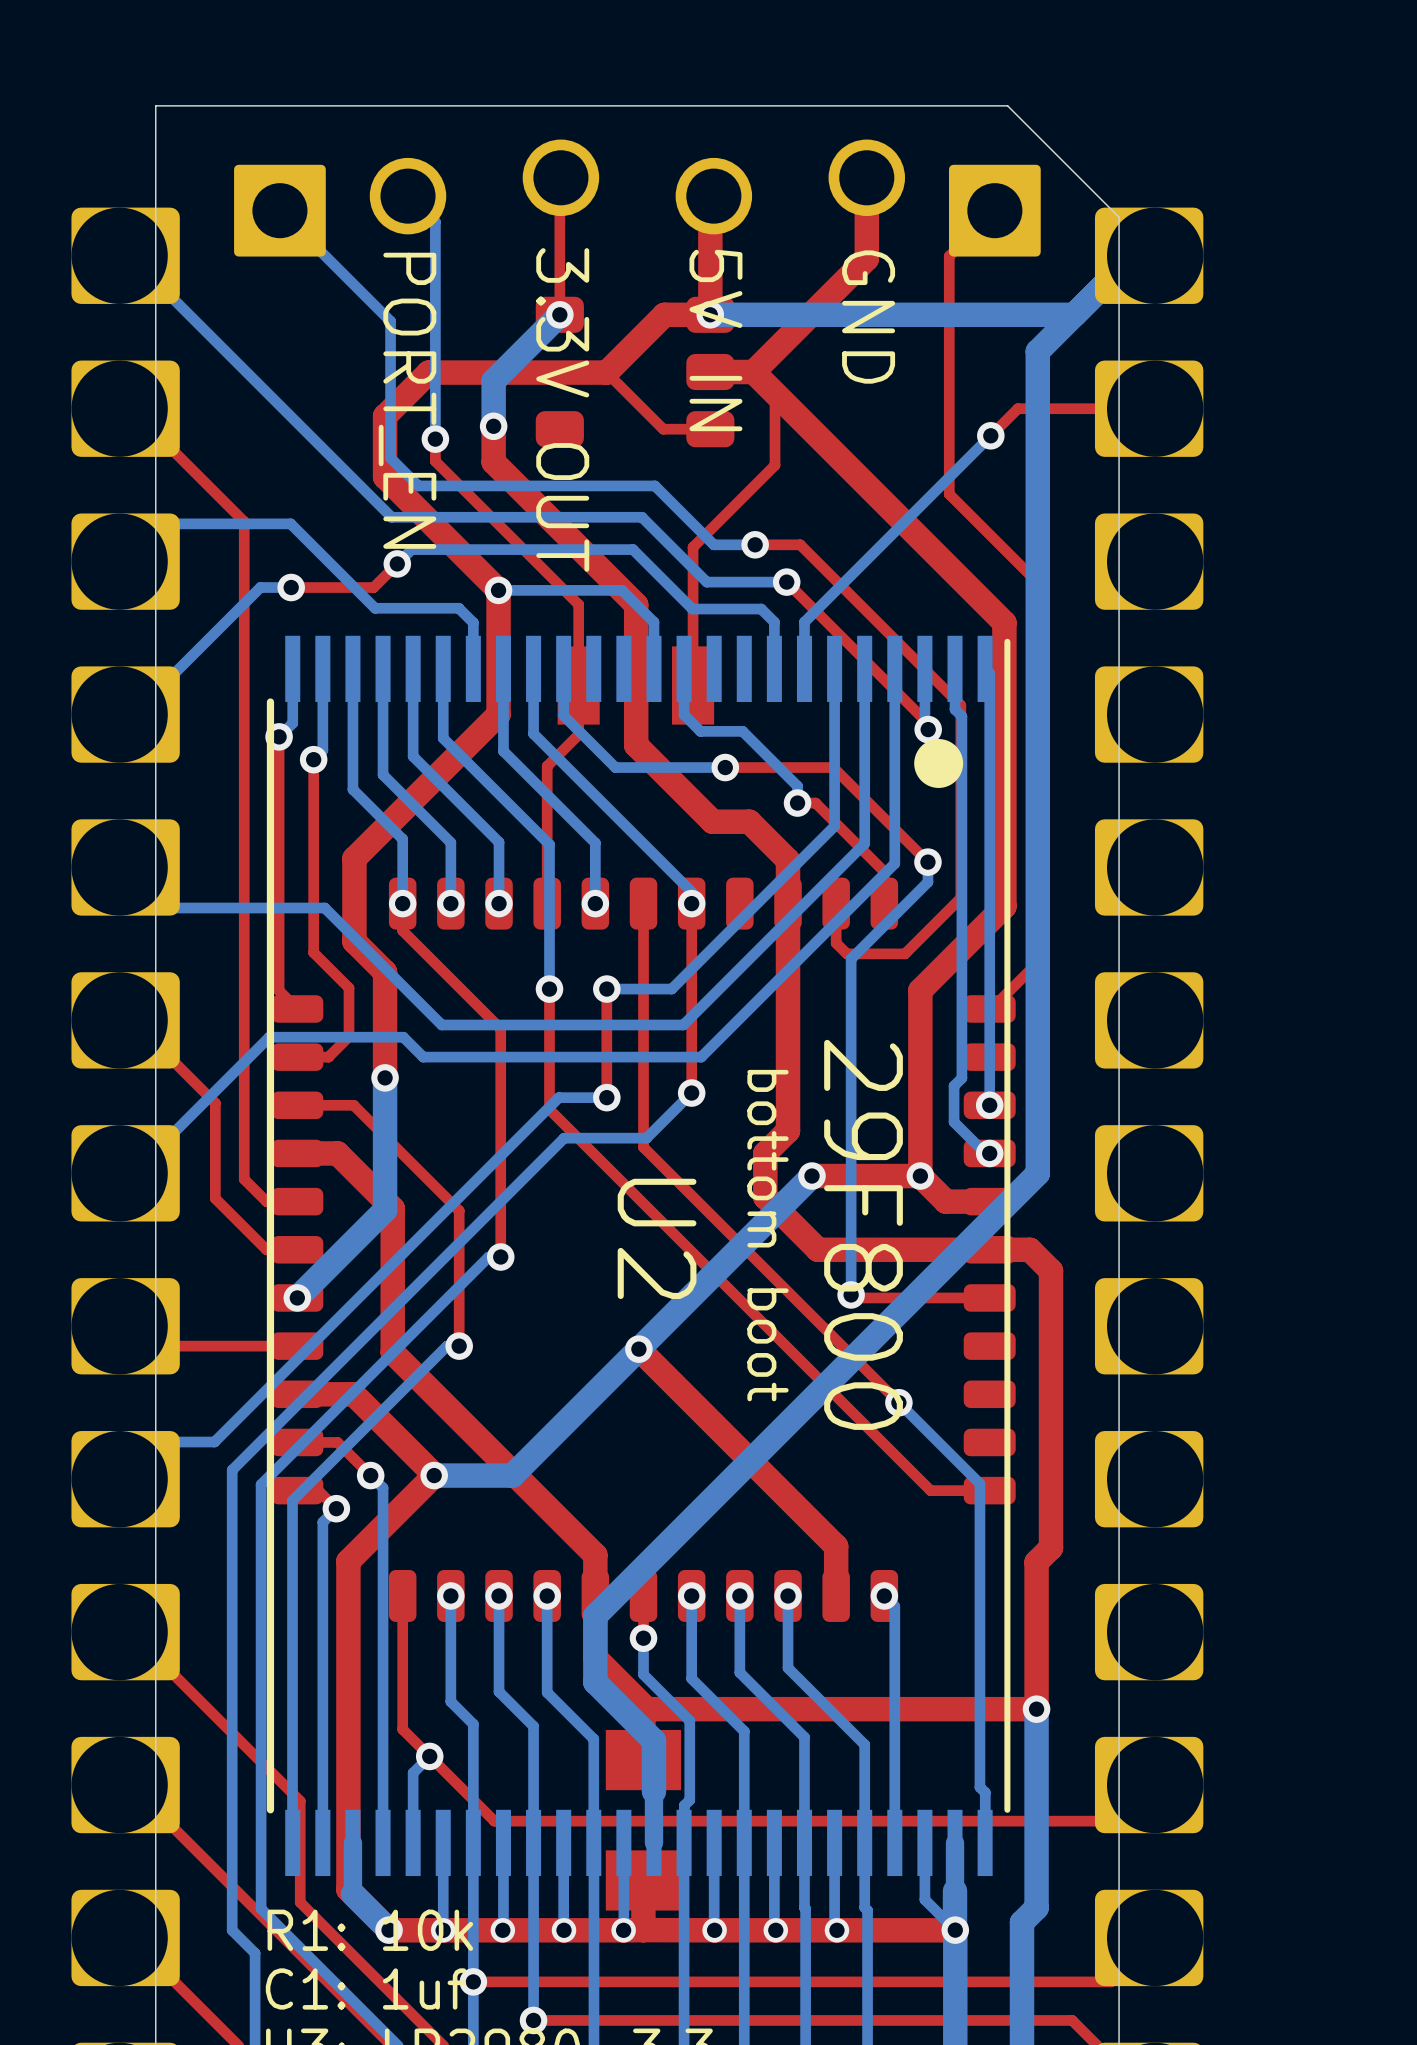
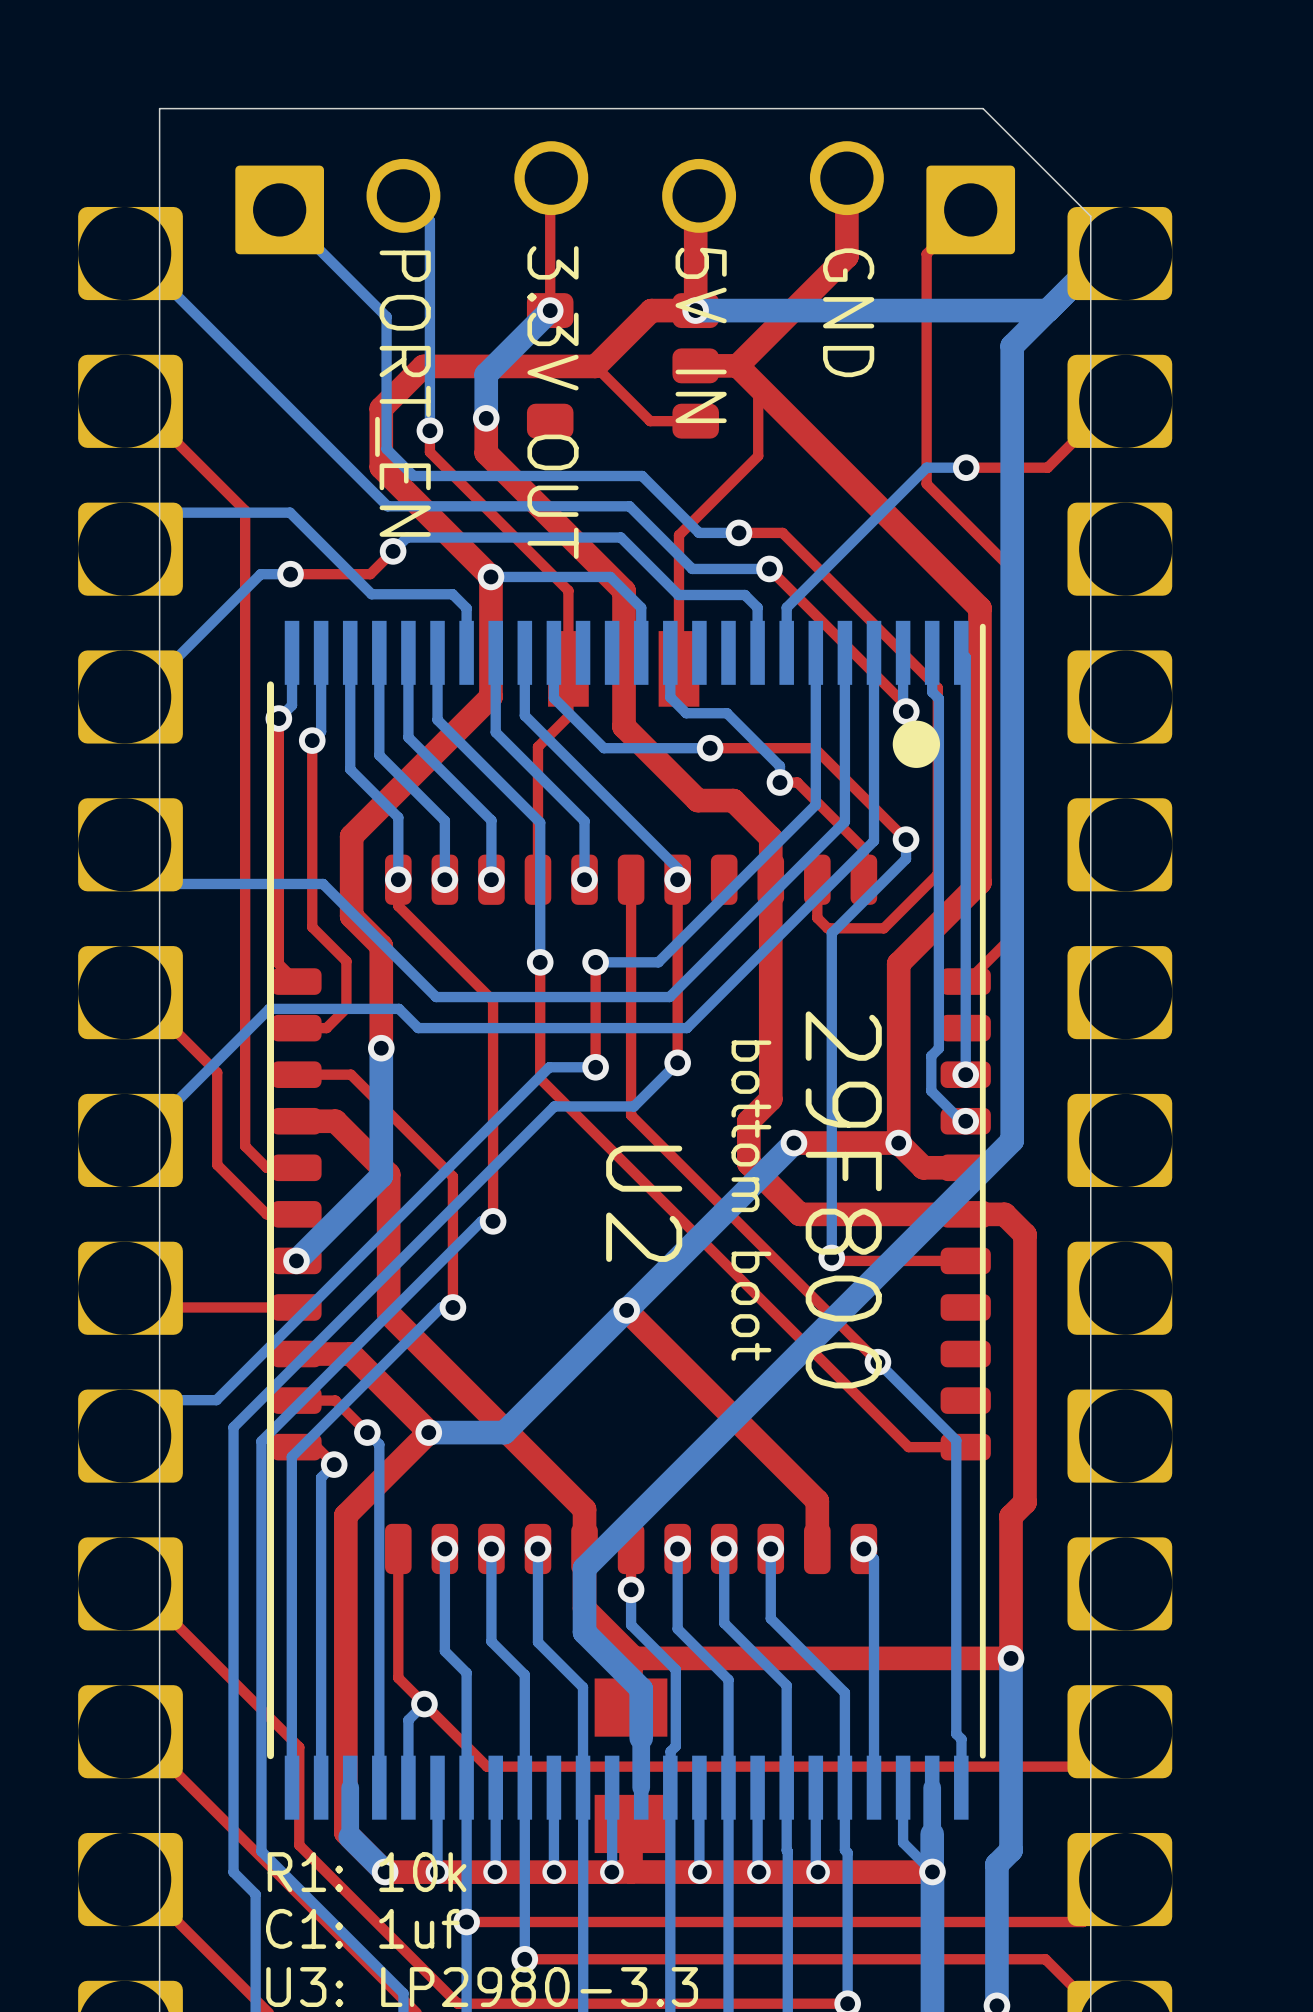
top track: (1143, 408) (1017, 408) (990, 435) -> (1114, 401) (1047, 467) (966, 467)
bottom track: (990, 435) (949, 477) -> (966, 467) (926, 467)
via position: (990, 435) -> (966, 467)

